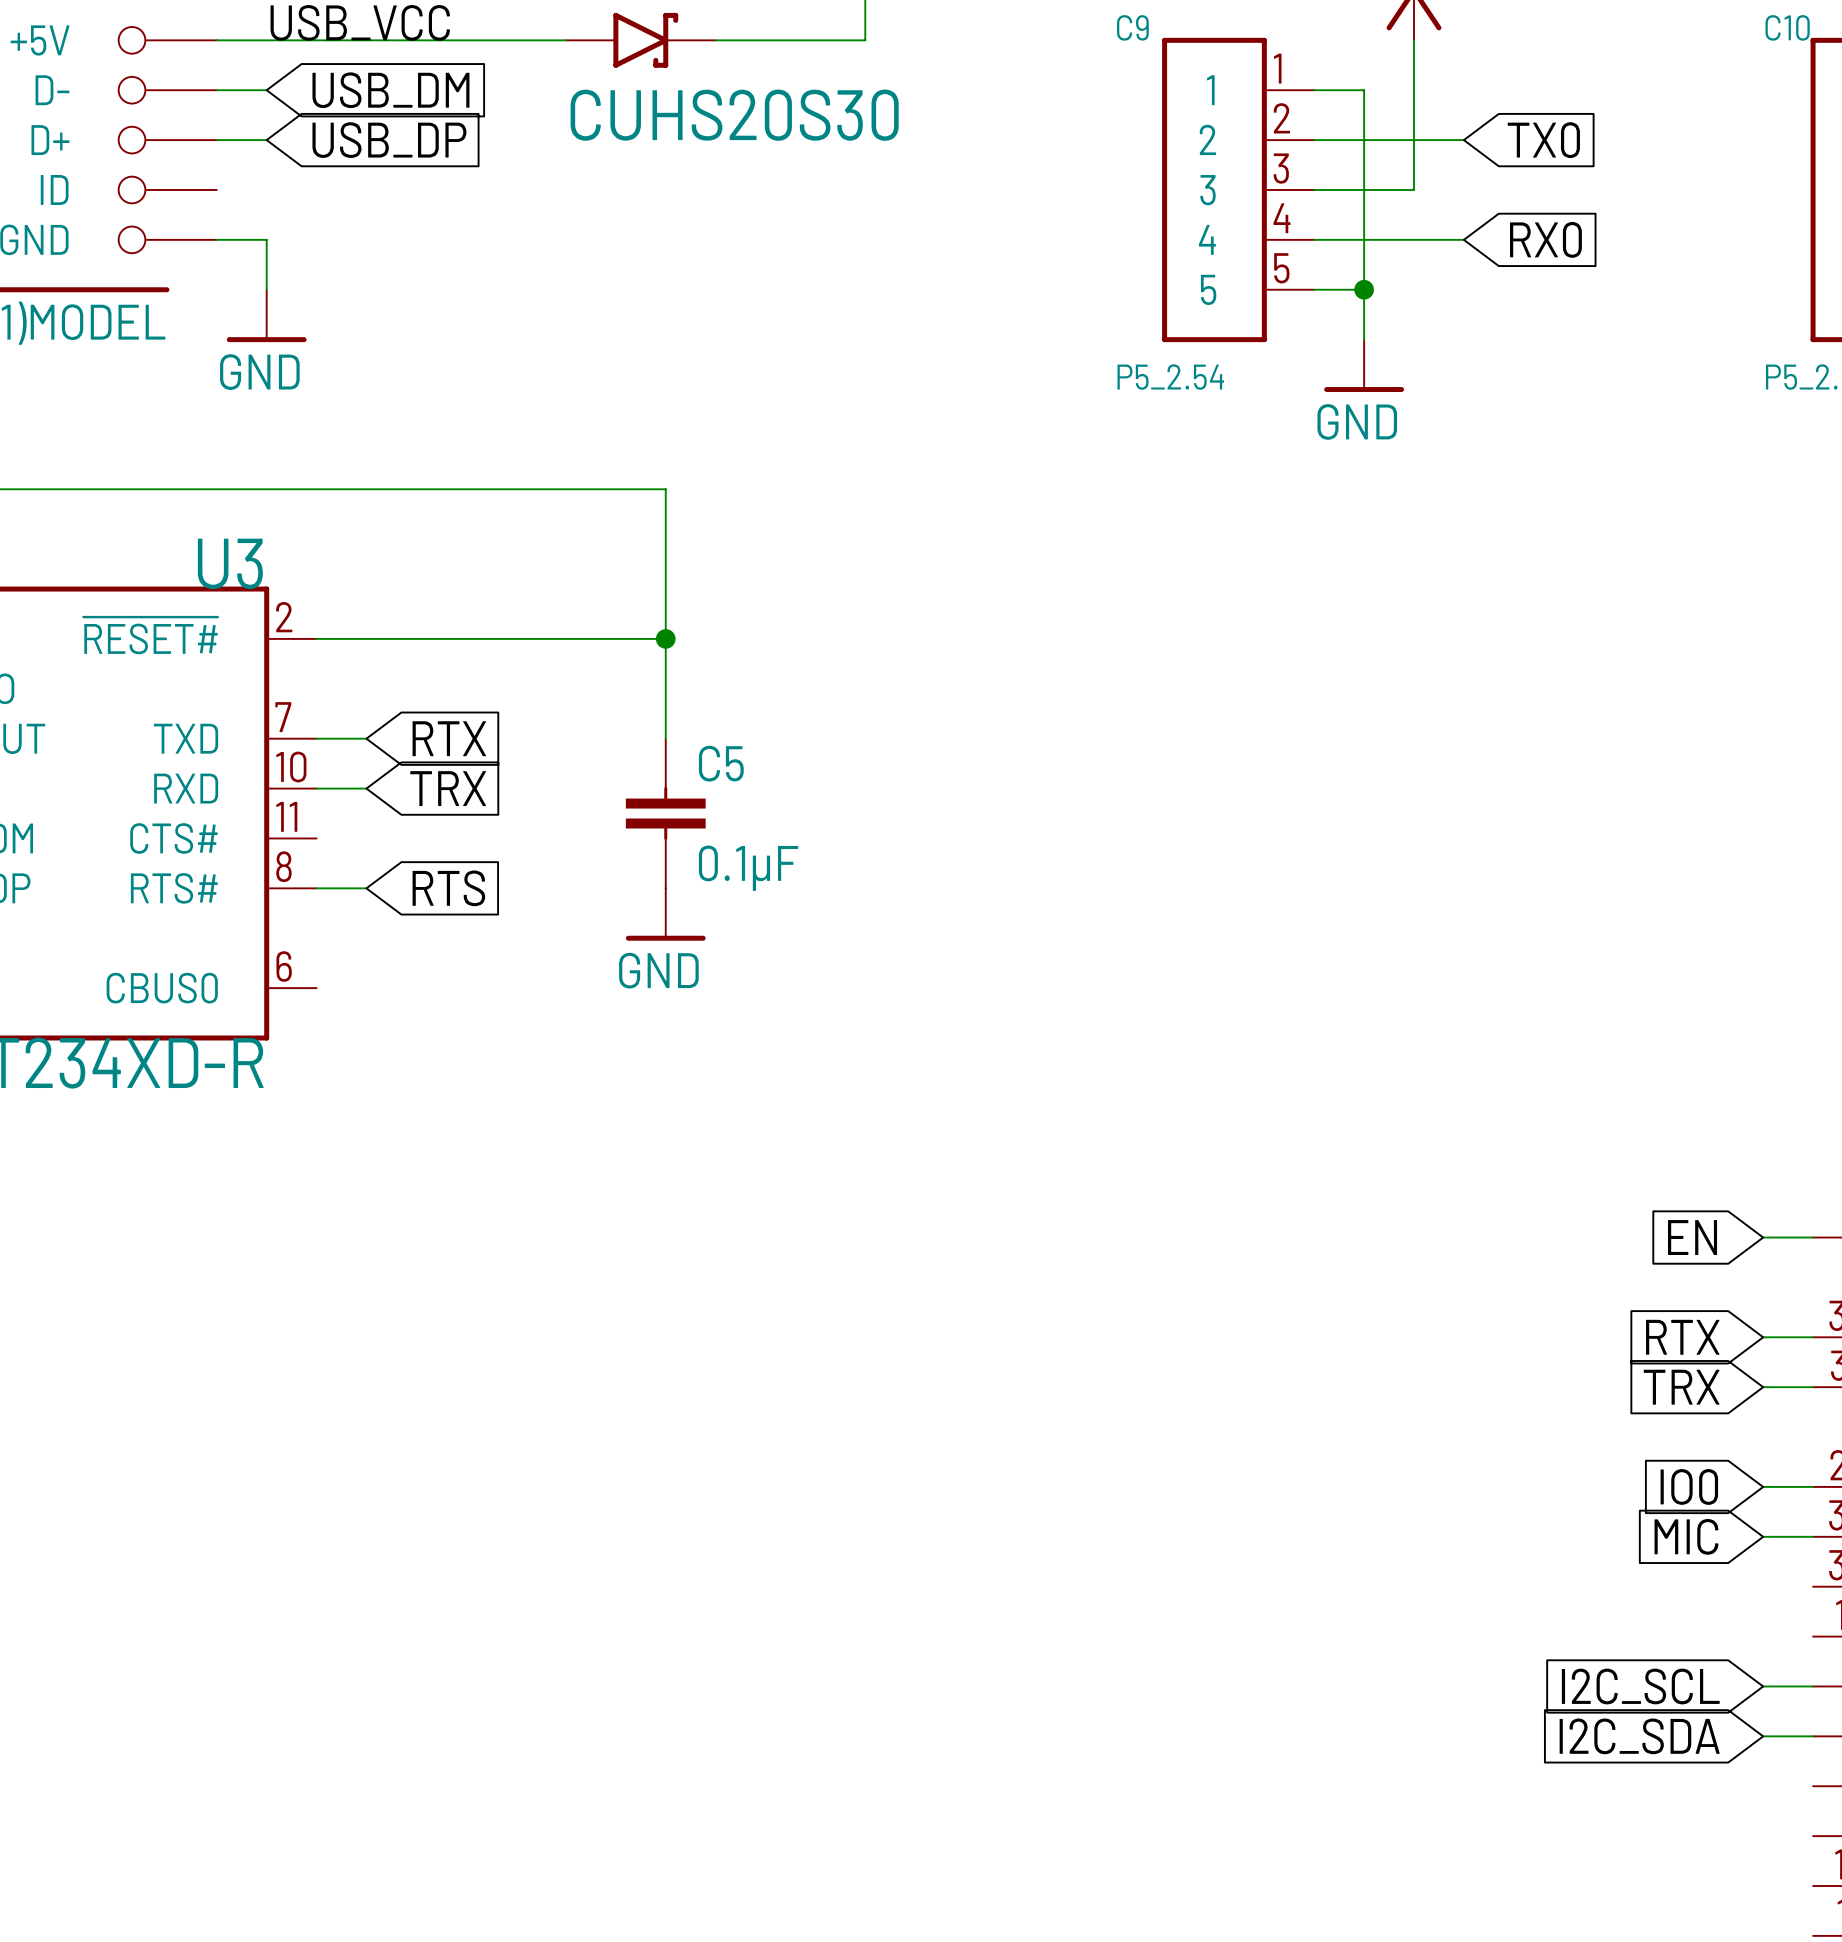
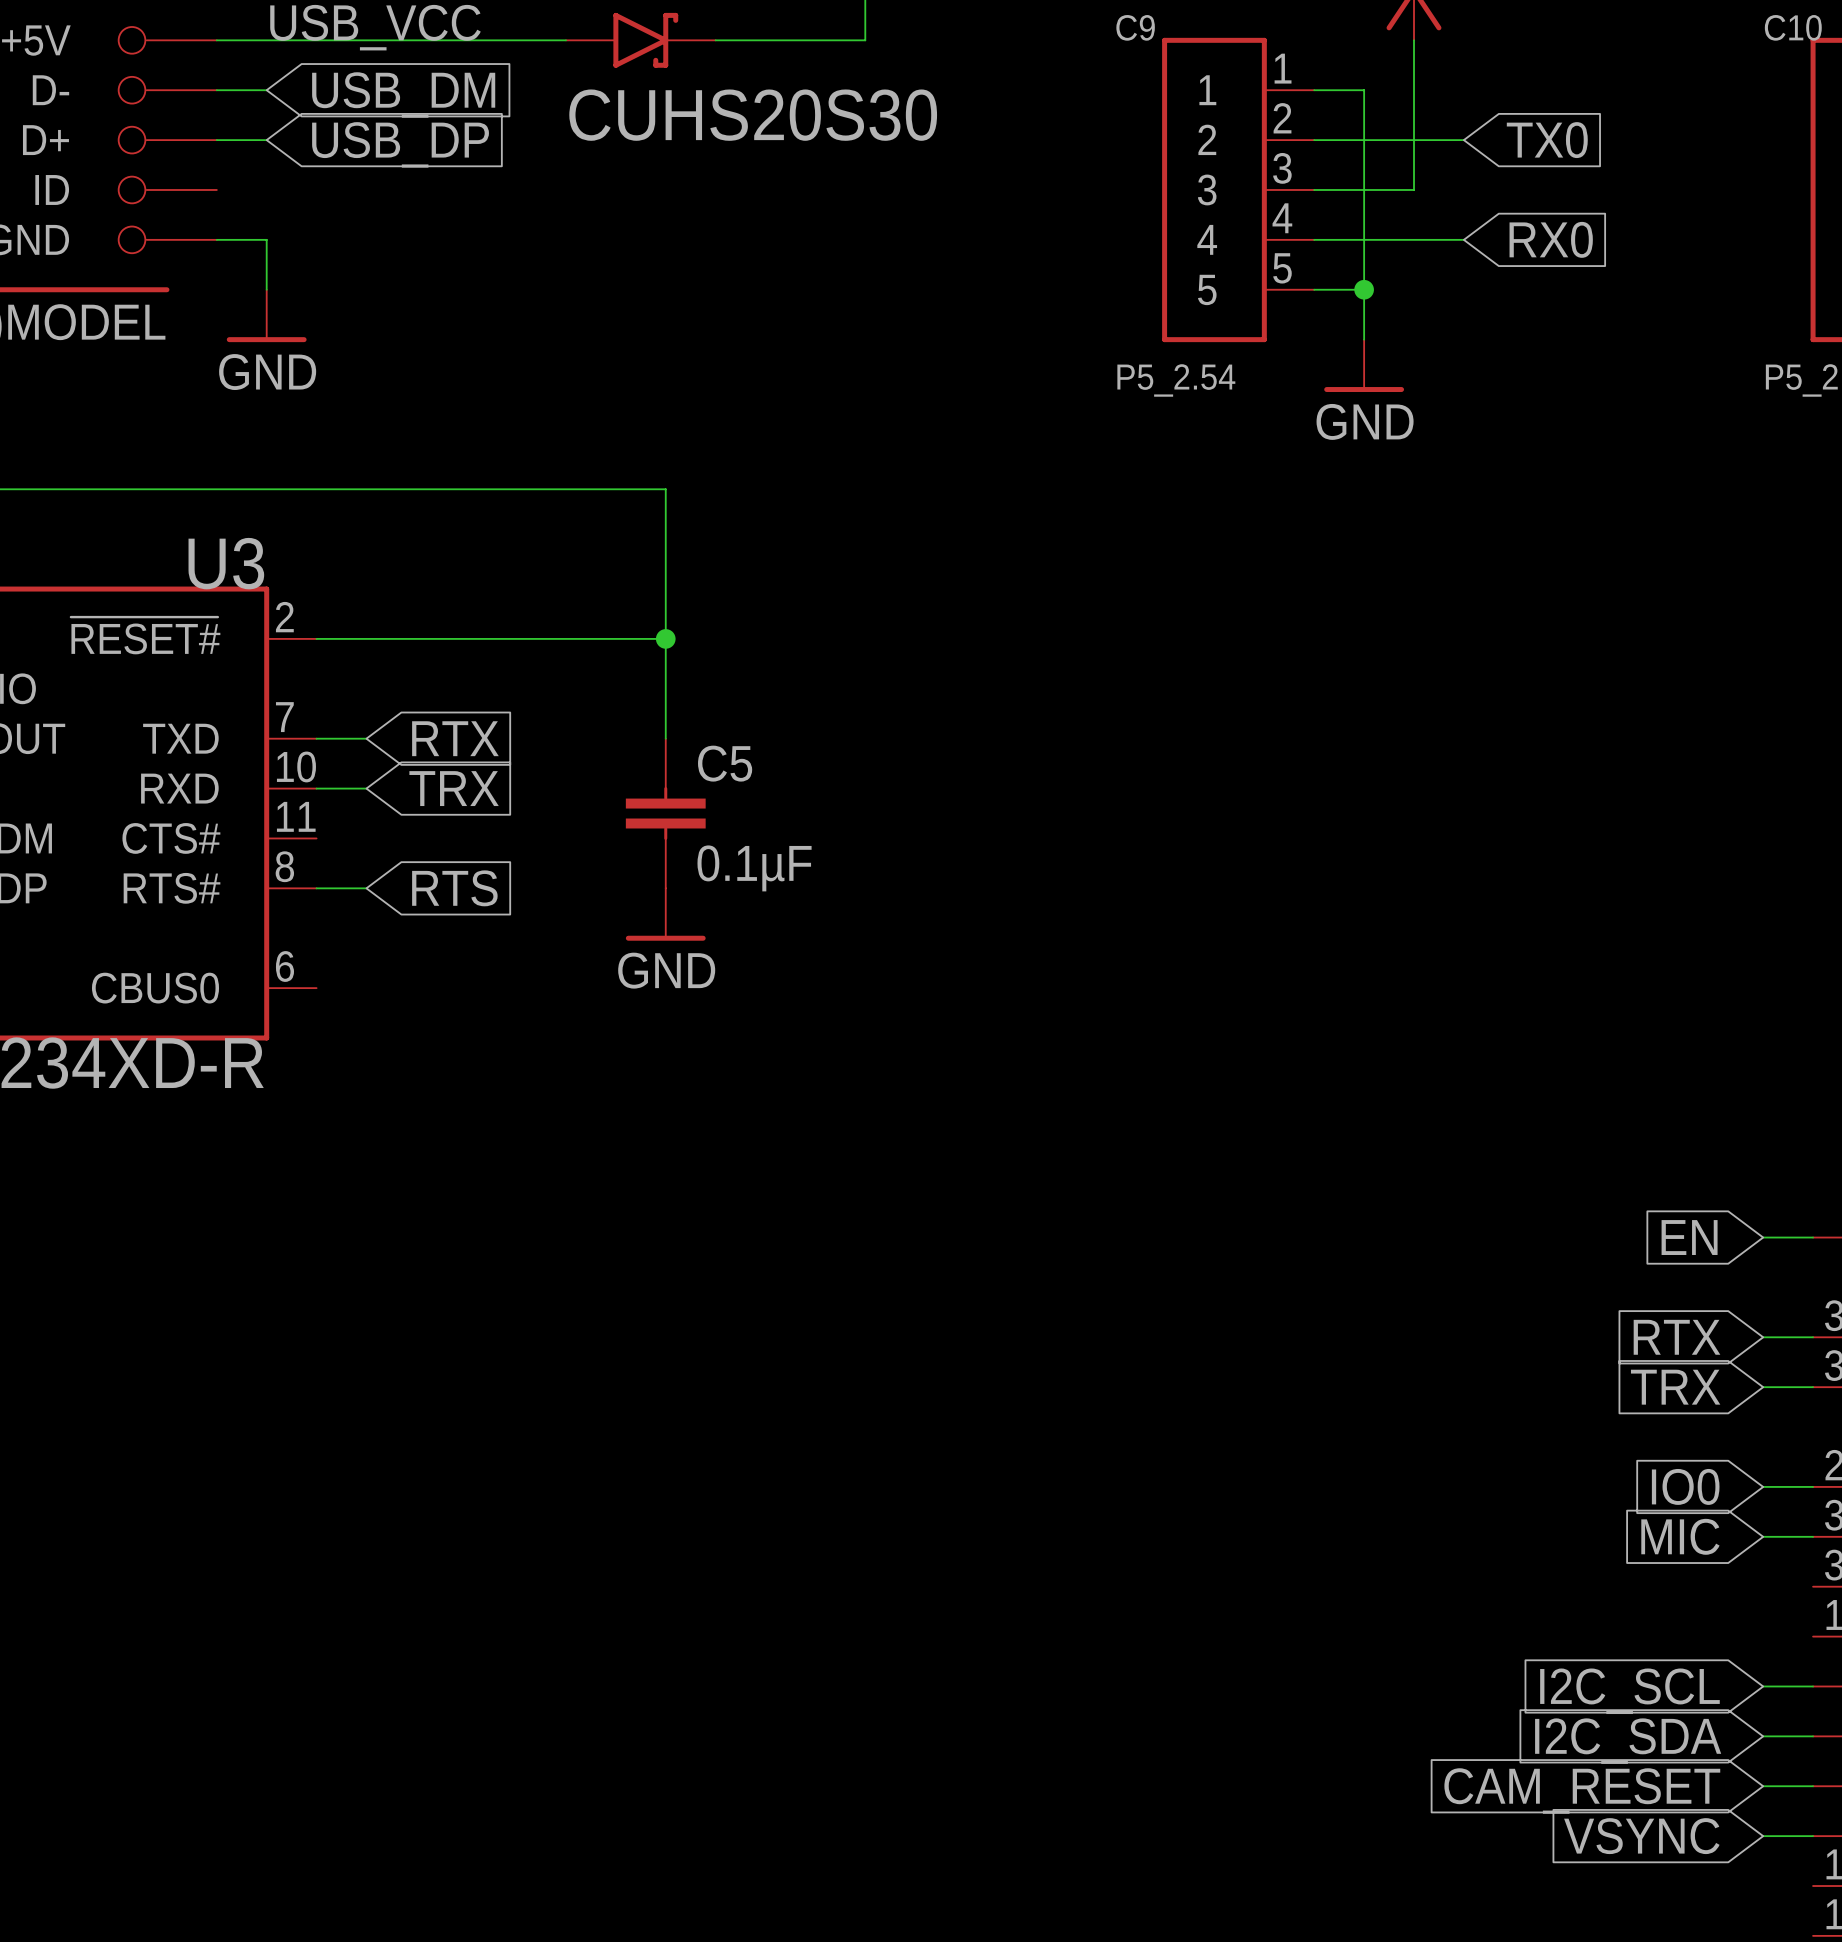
global label: none -> CAM_RESET (1582, 1791)
wire: none -> (1763, 1786) (1813, 1786)
global label: none -> VSYNC (1641, 1836)
wire: none -> (1763, 1836) (1813, 1836)

